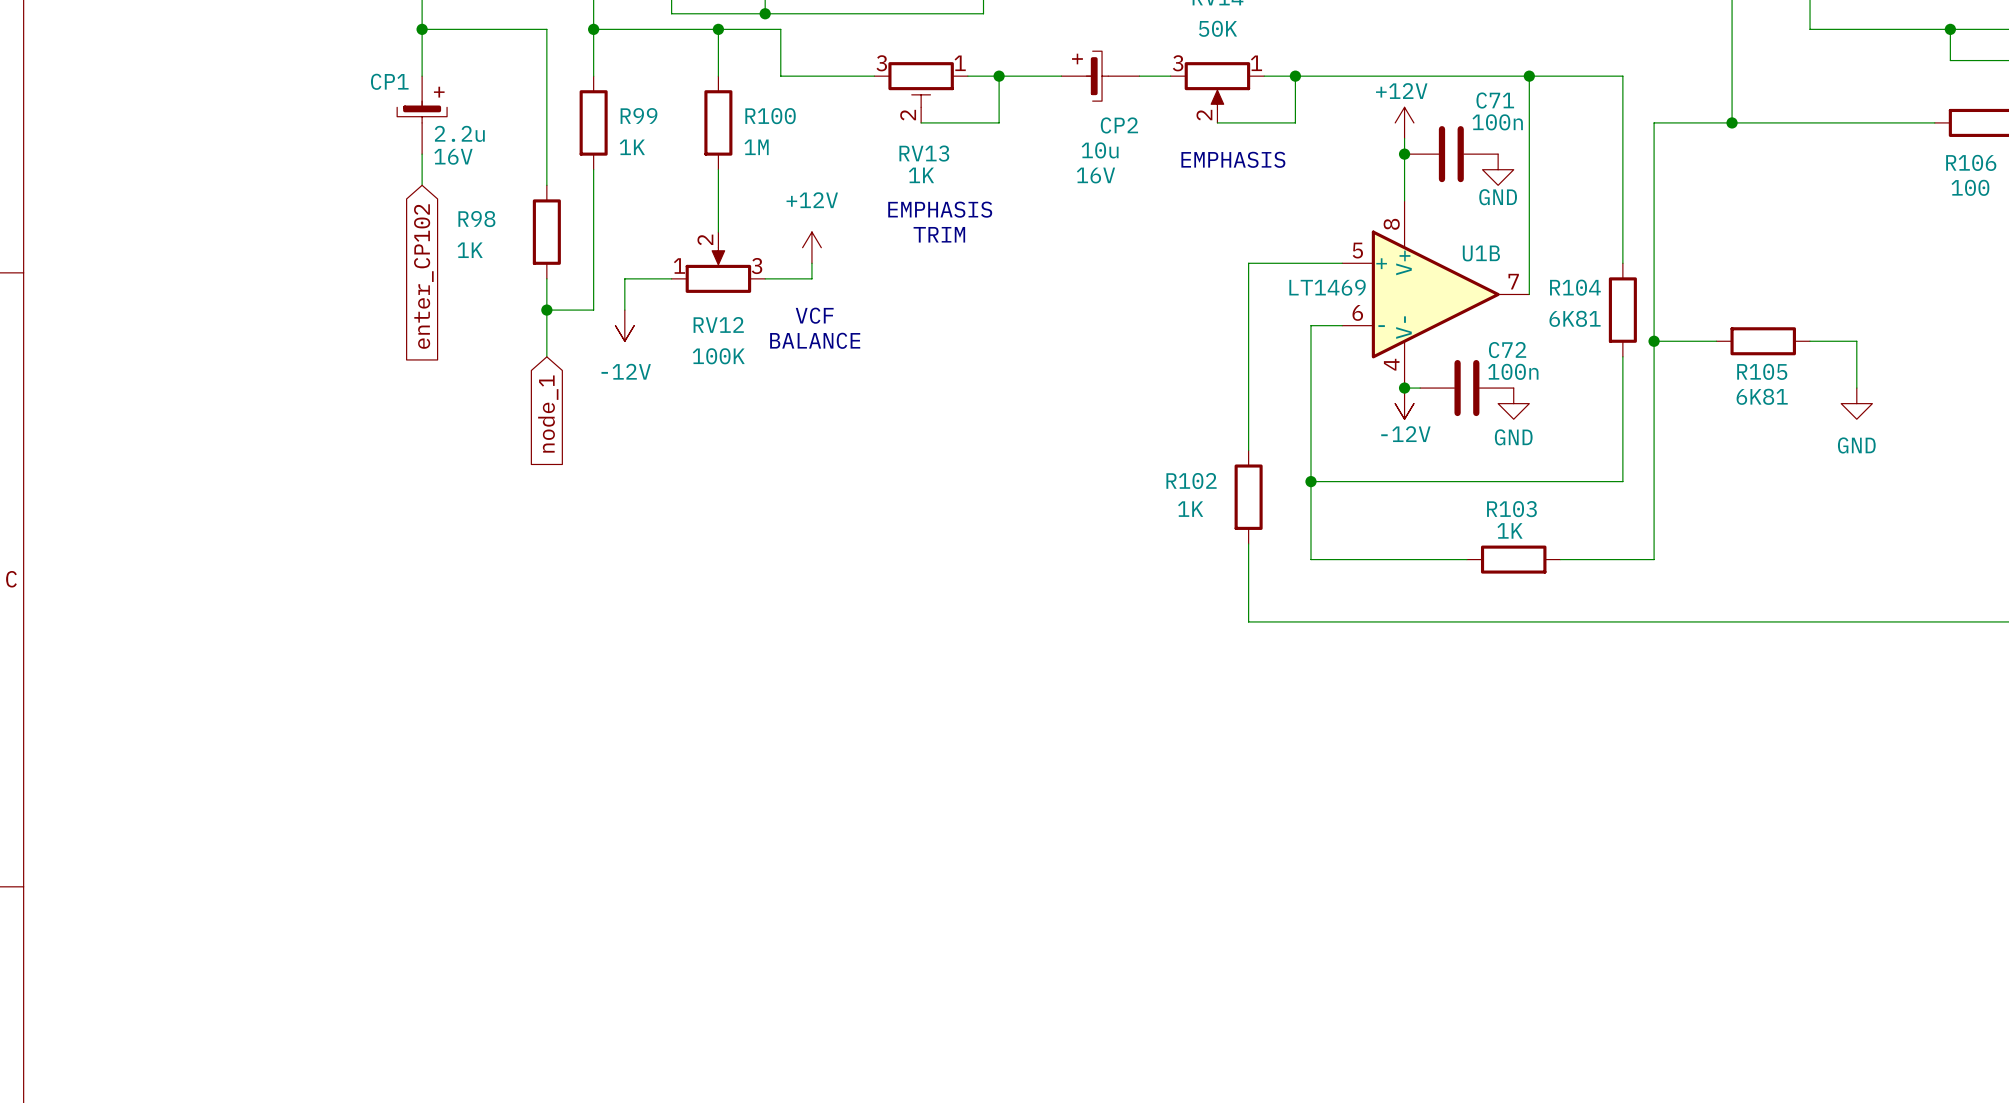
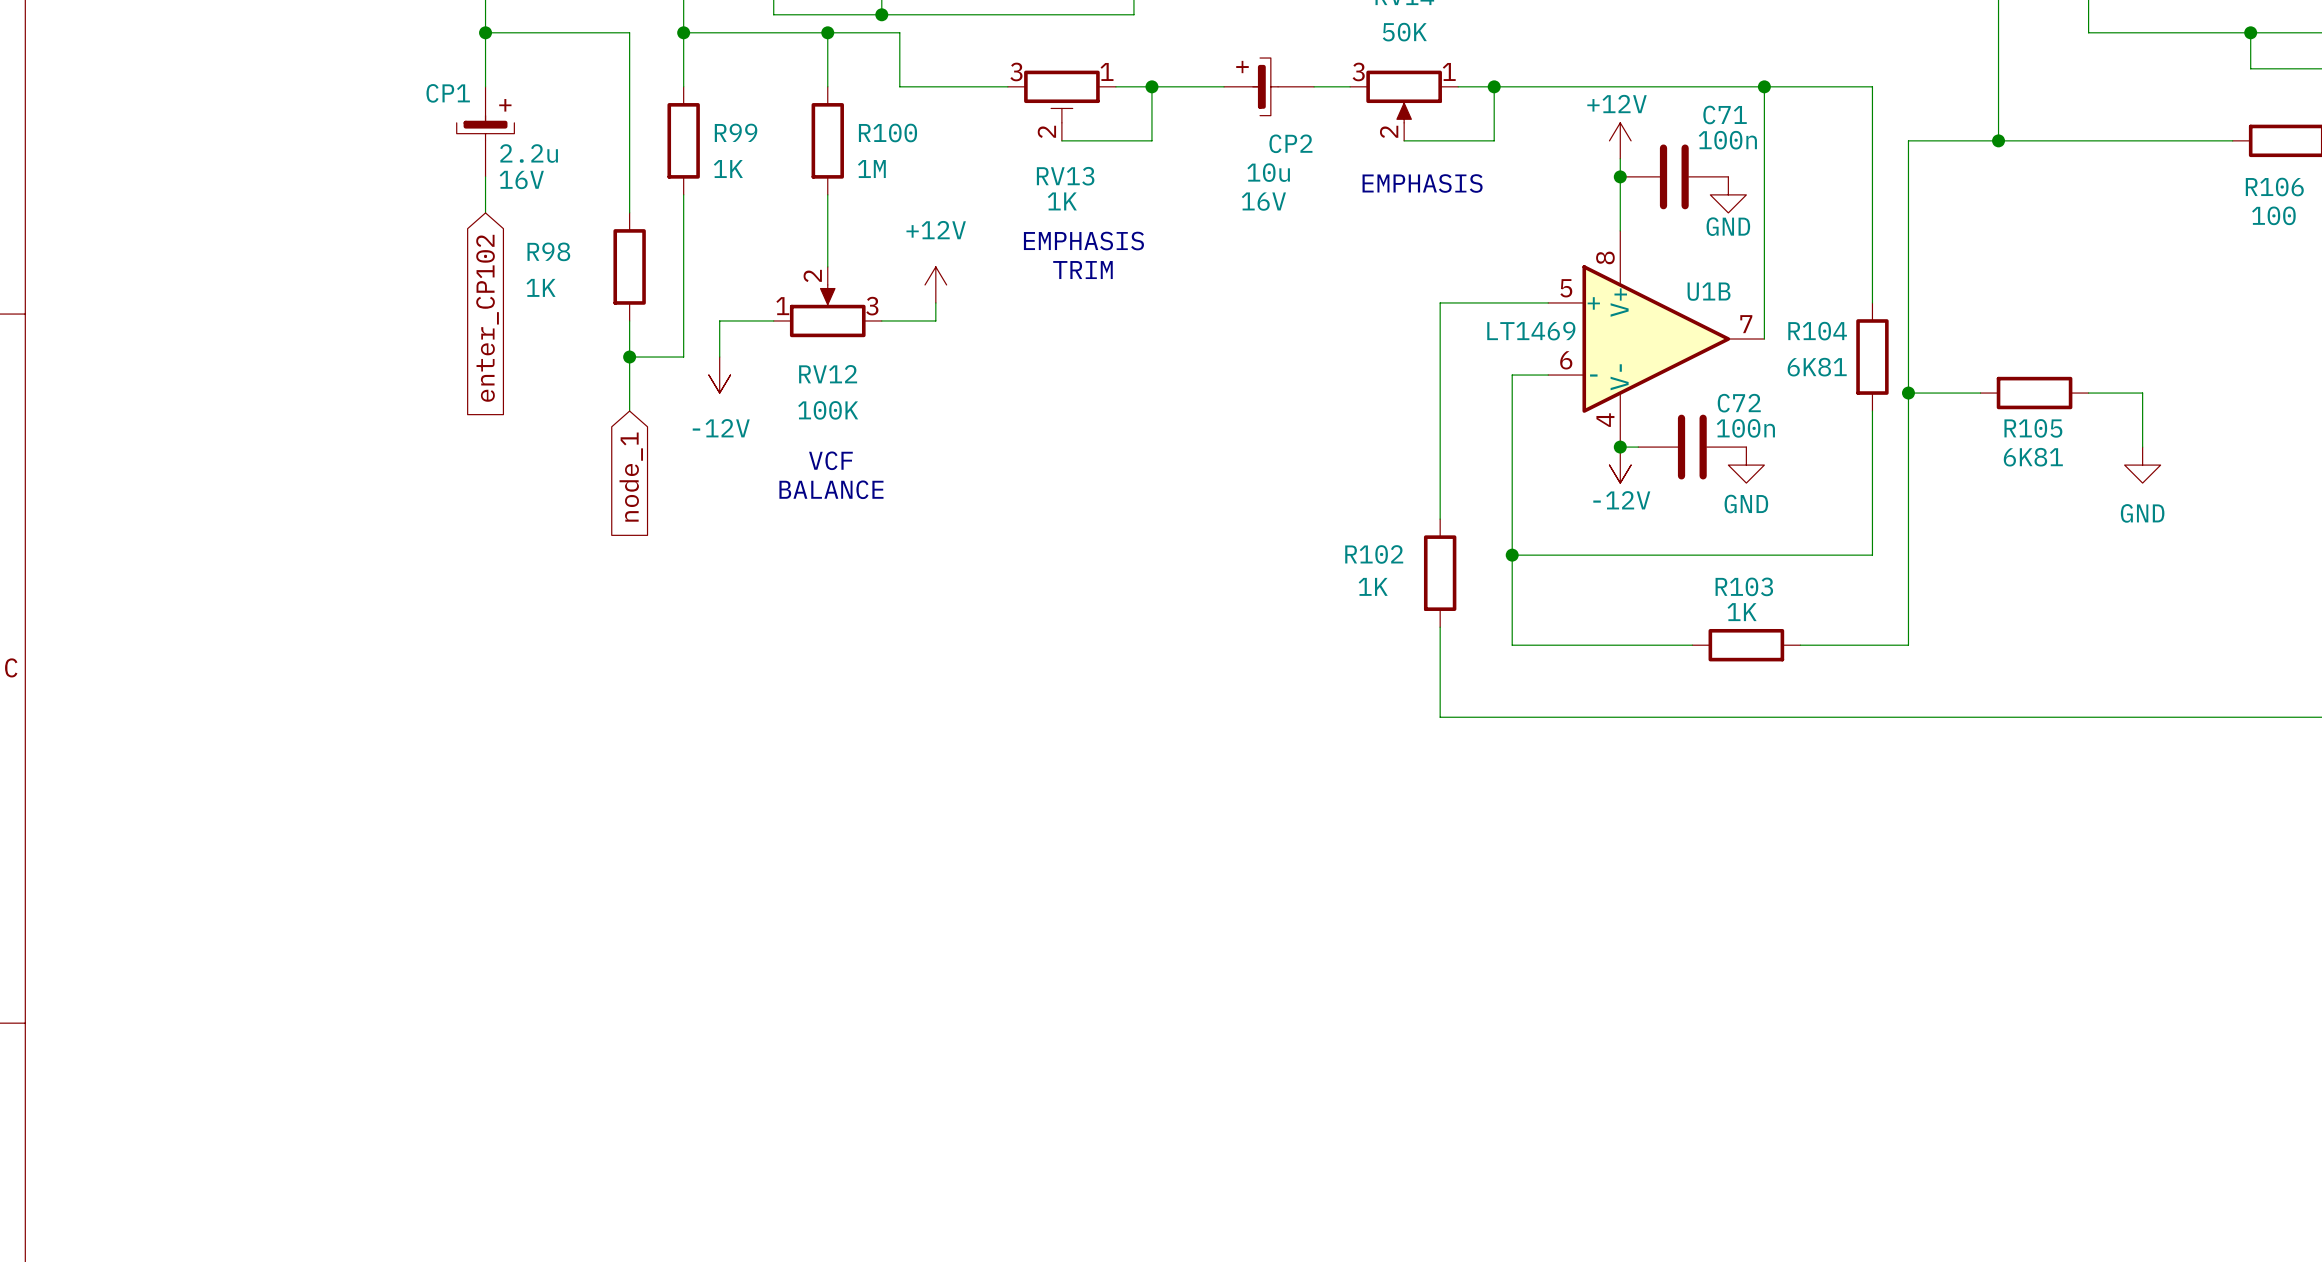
text position: VCF (814, 315) -> VCF (830, 460)
text position: BALANCE (815, 340) -> BALANCE (831, 489)

